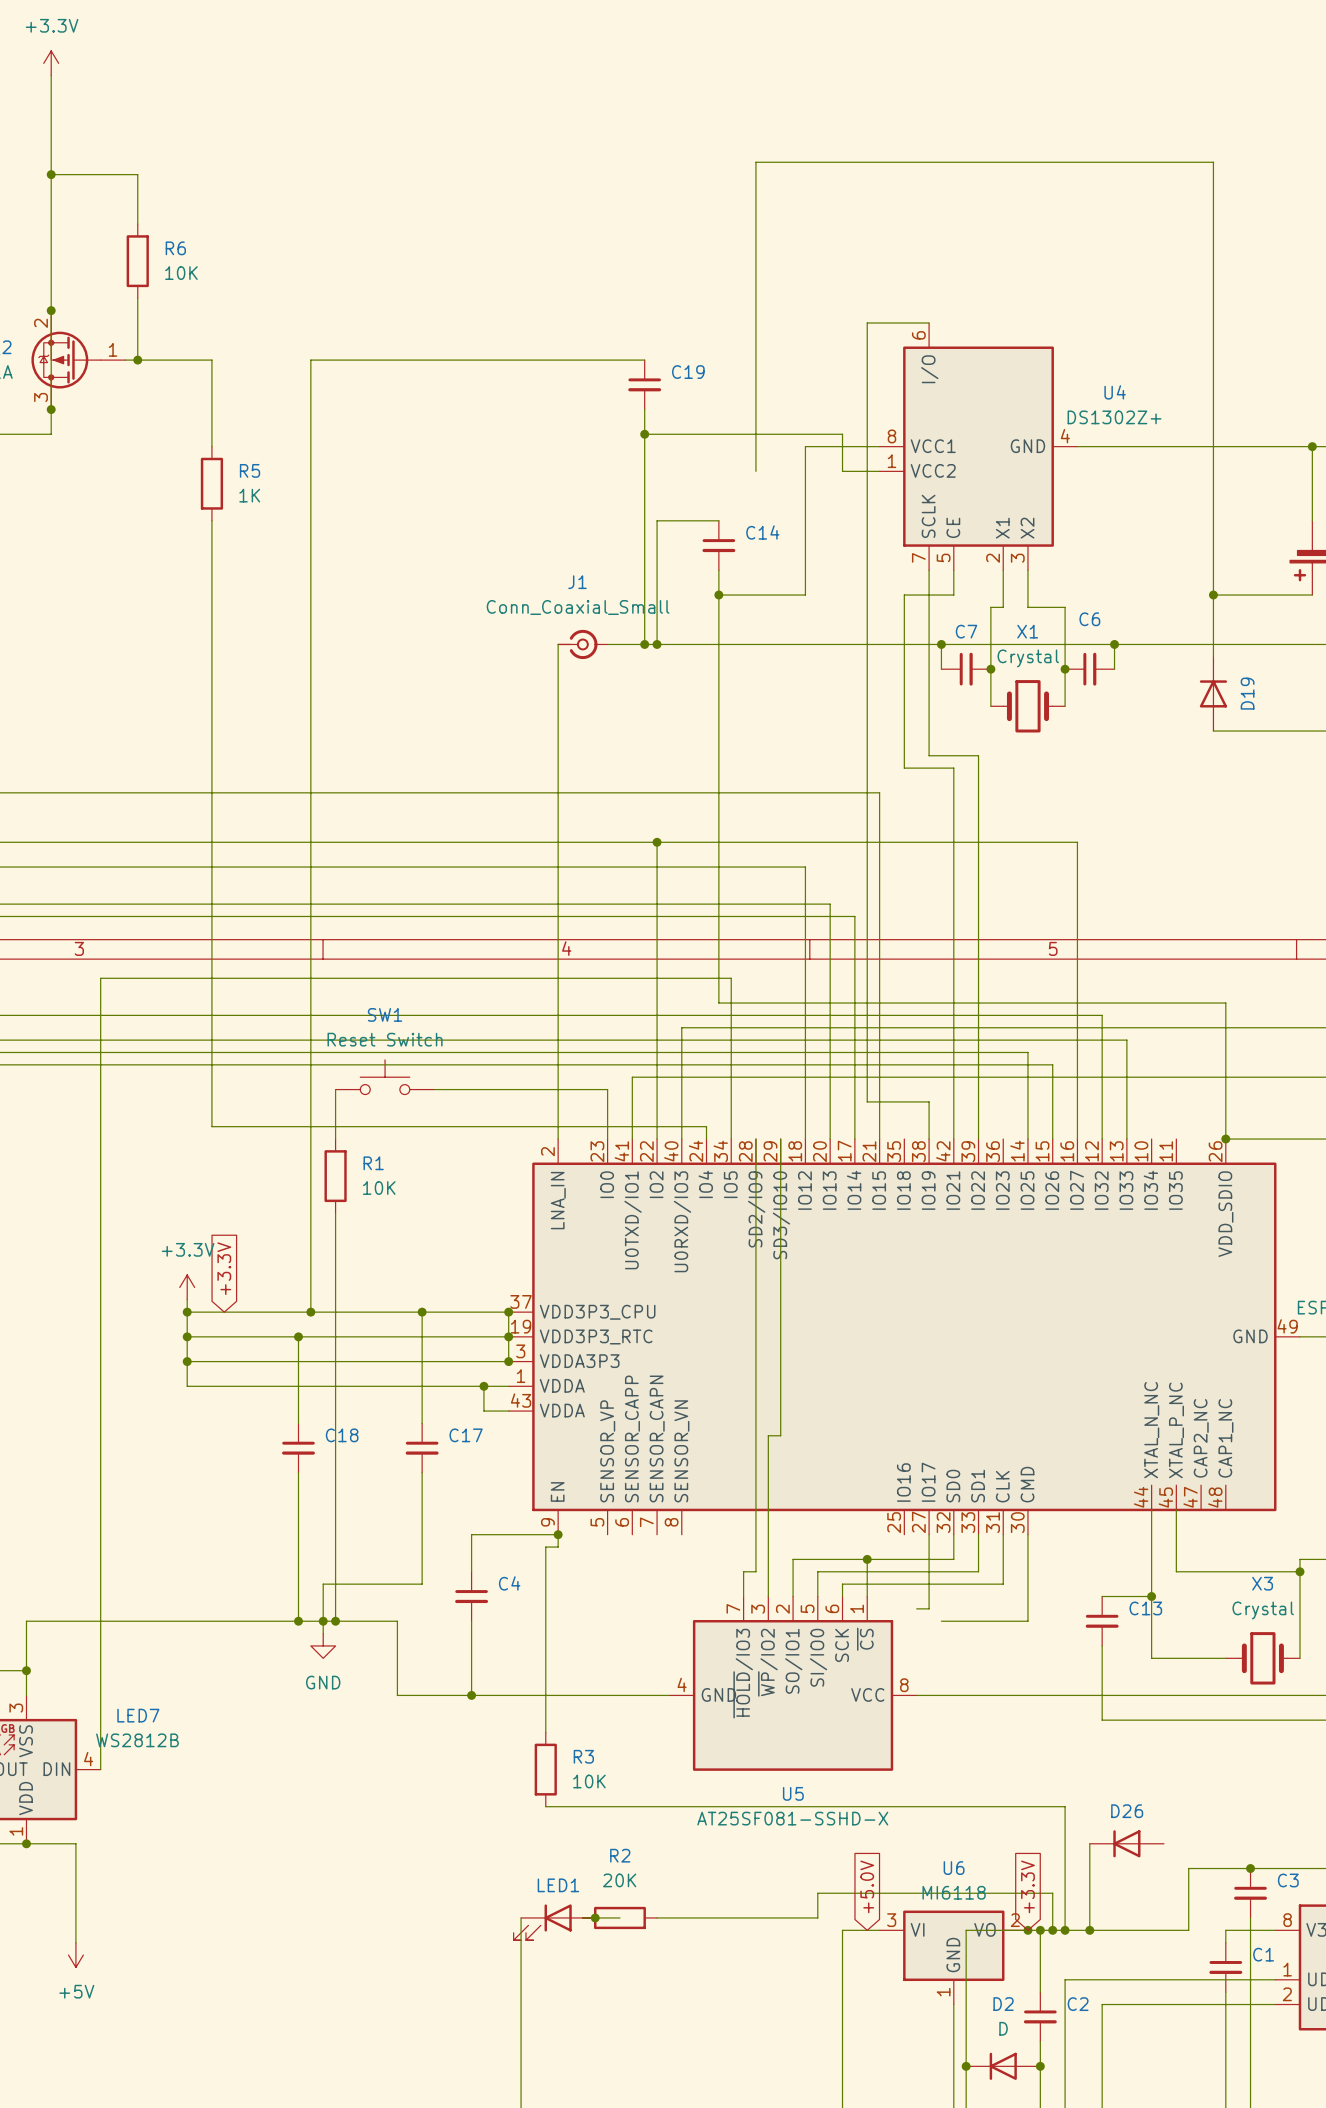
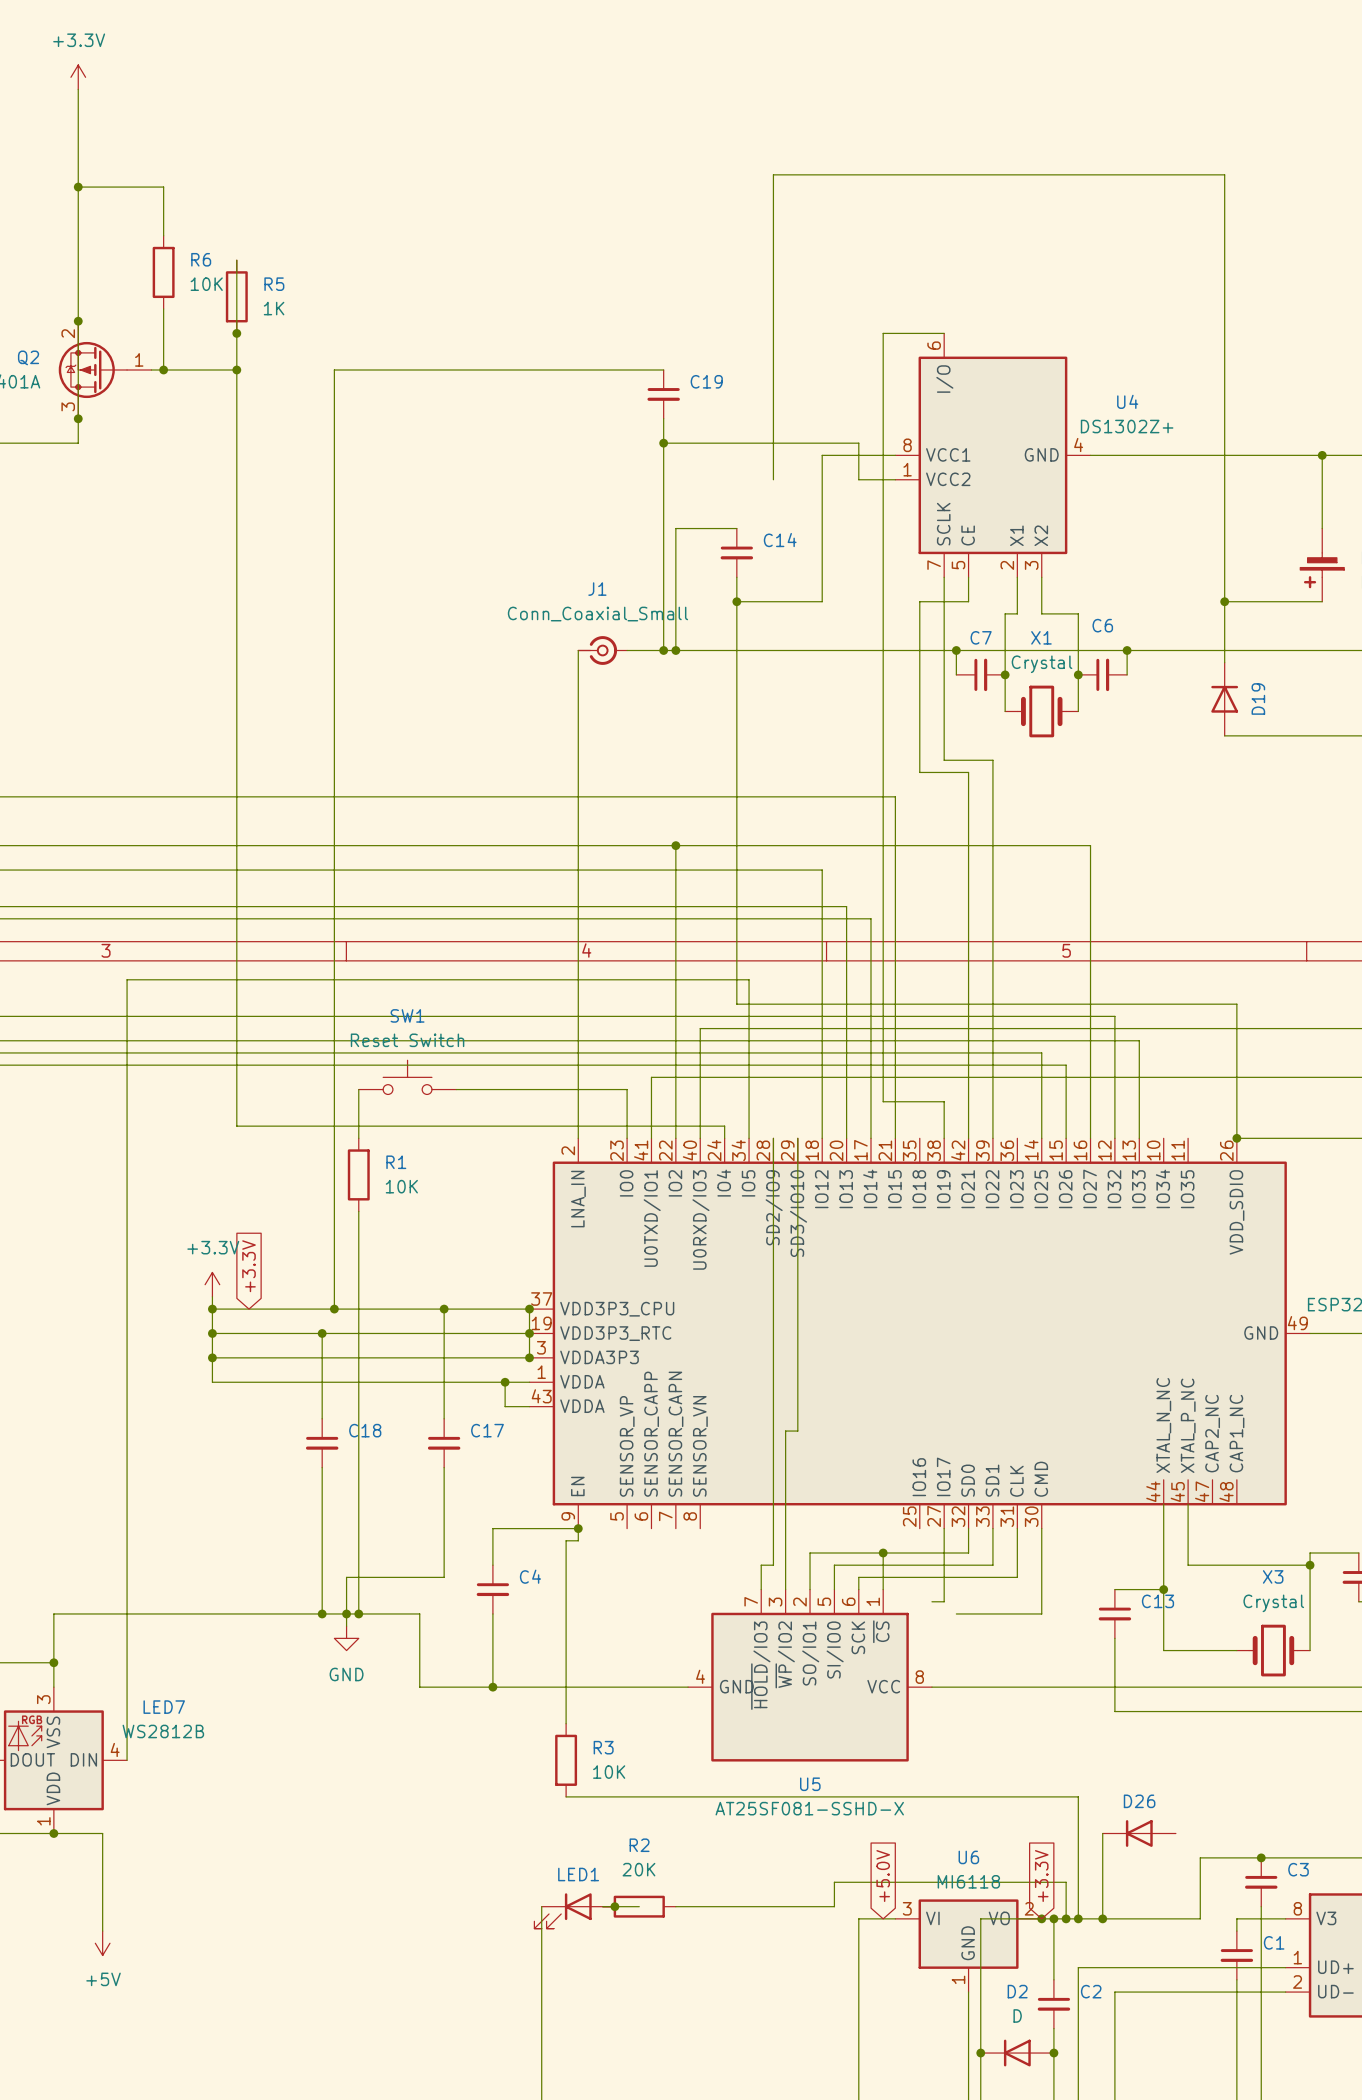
wire: none -> (236, 260) (236, 369)
junction: none -> (236, 333)
junction: none -> (236, 369)
wire: none -> (236, 455) (236, 528)
R5 position: (211, 483) -> (236, 296)

